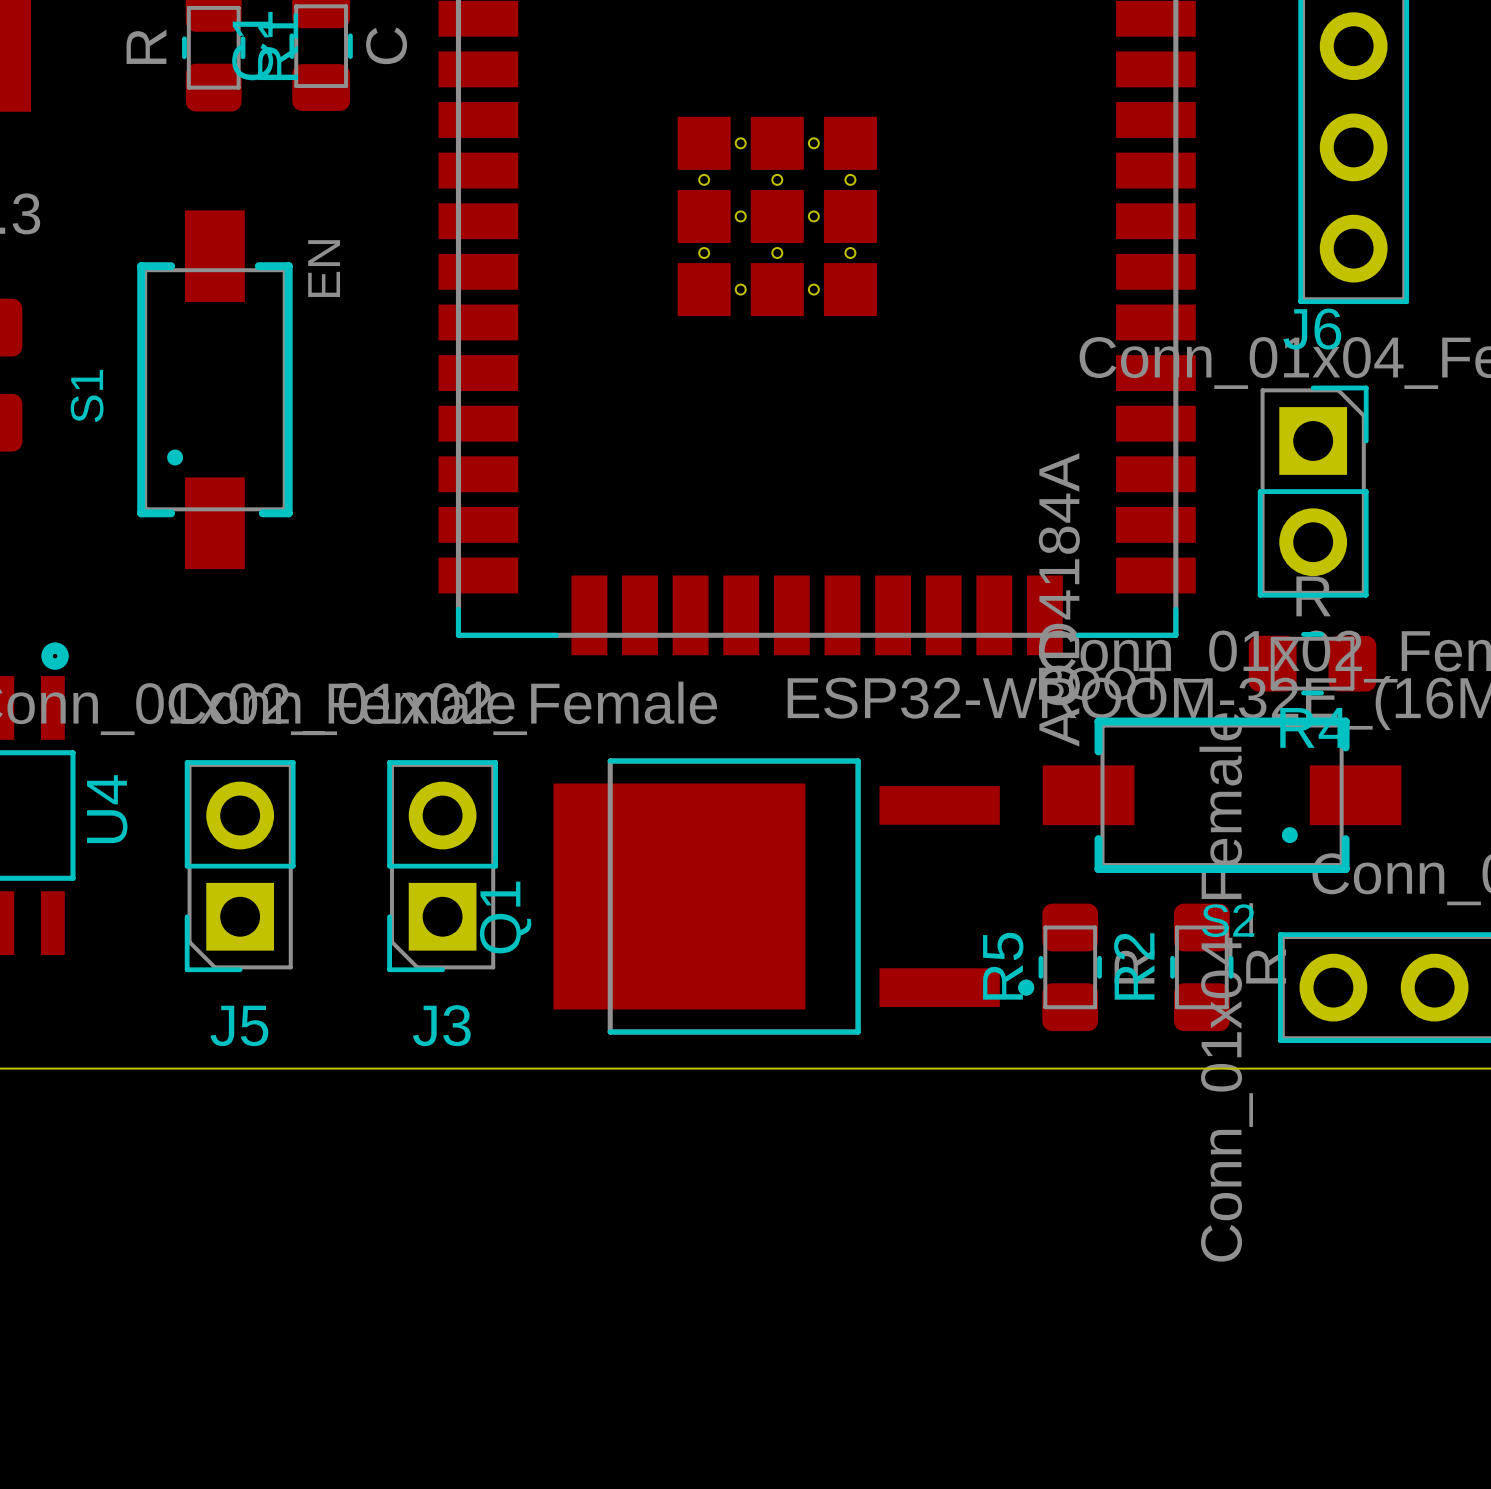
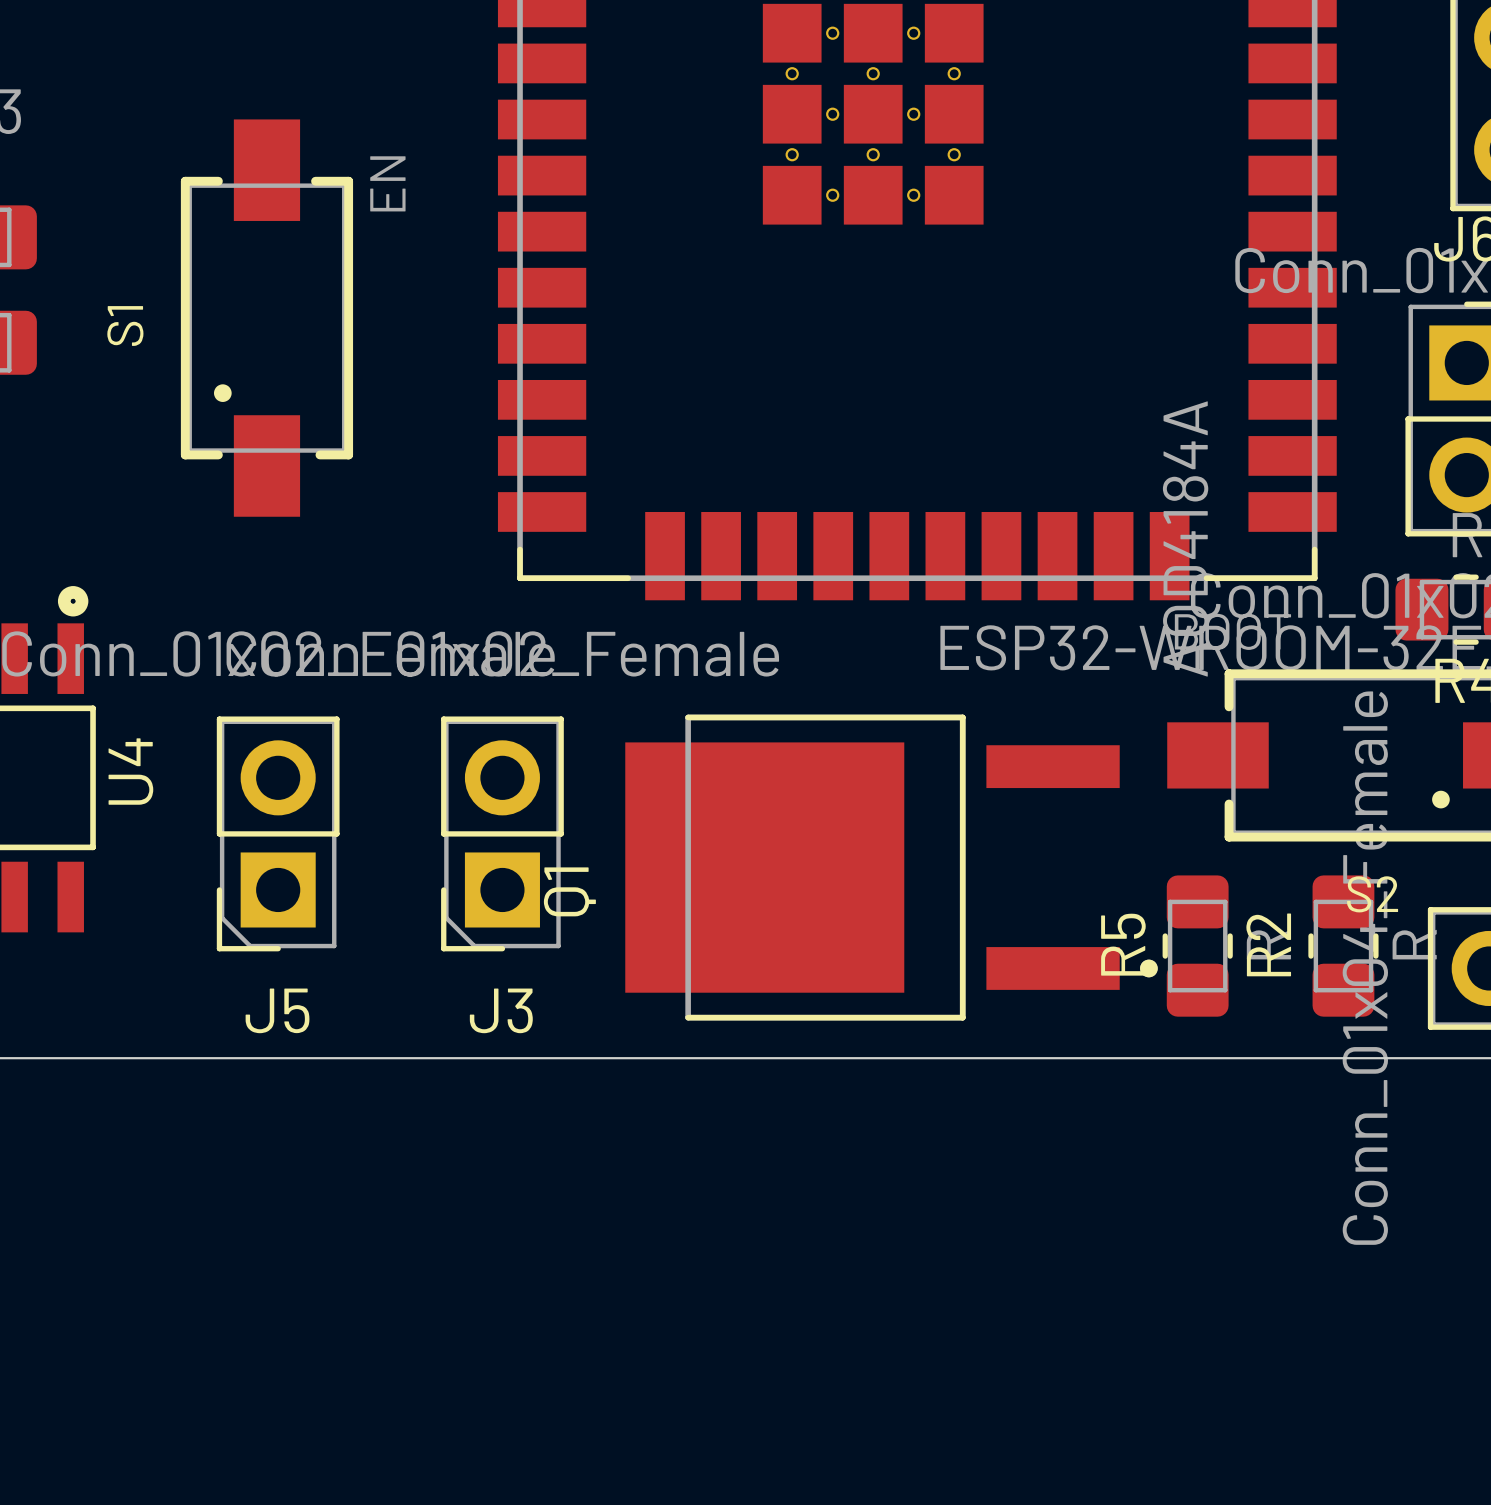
S1 position: (214, 389) -> (266, 318)

